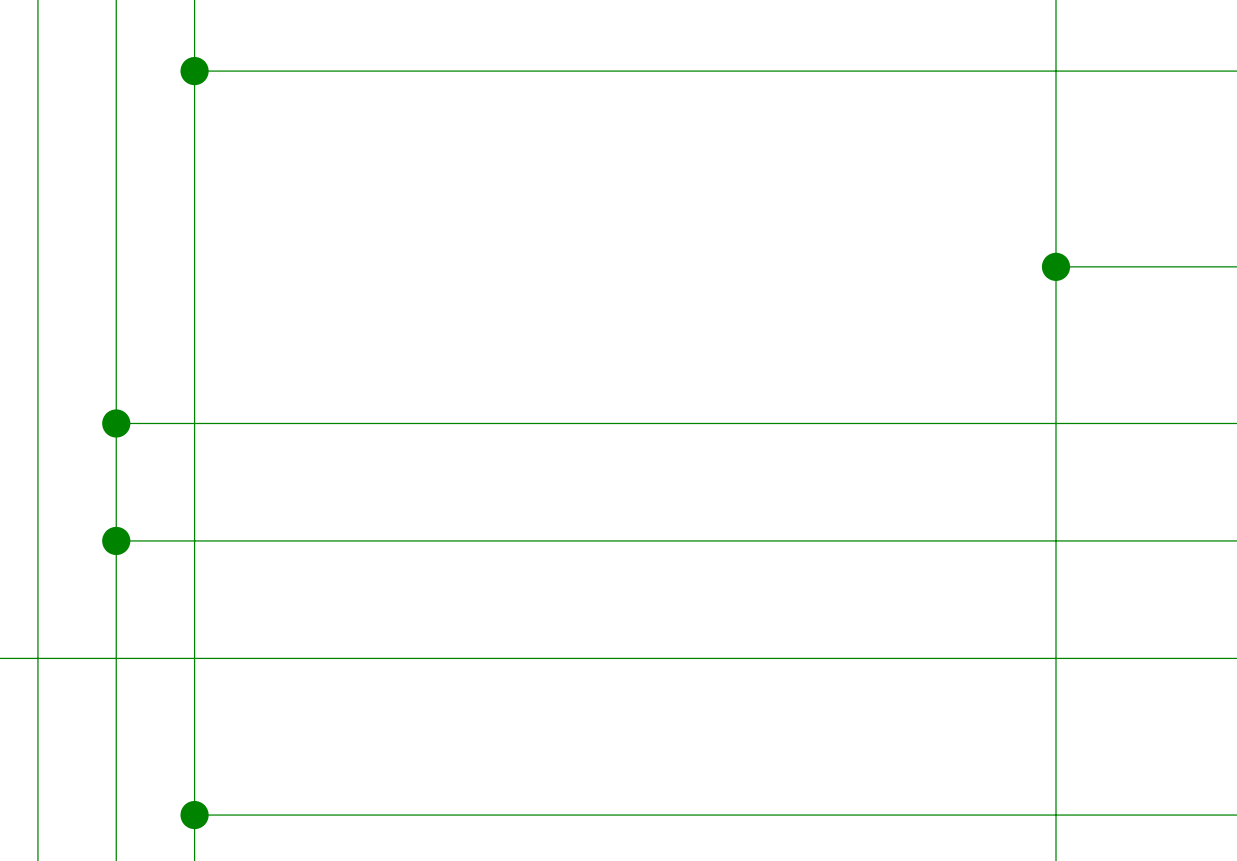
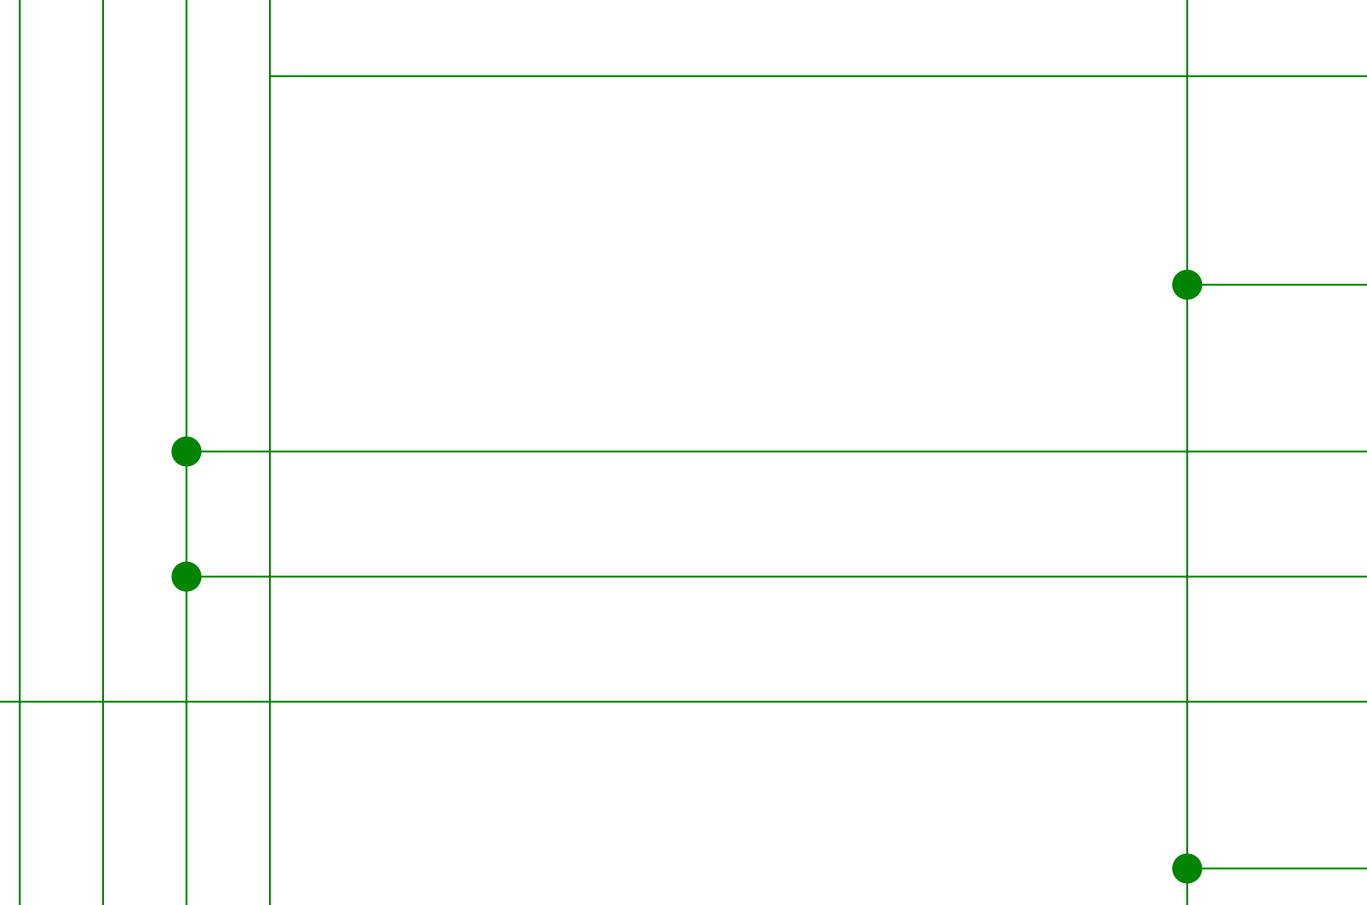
junction: (194, 71) -> none
wire: (194, 815) (1056, 815) -> none
junction: (194, 815) -> none
junction: none -> (1187, 868)

